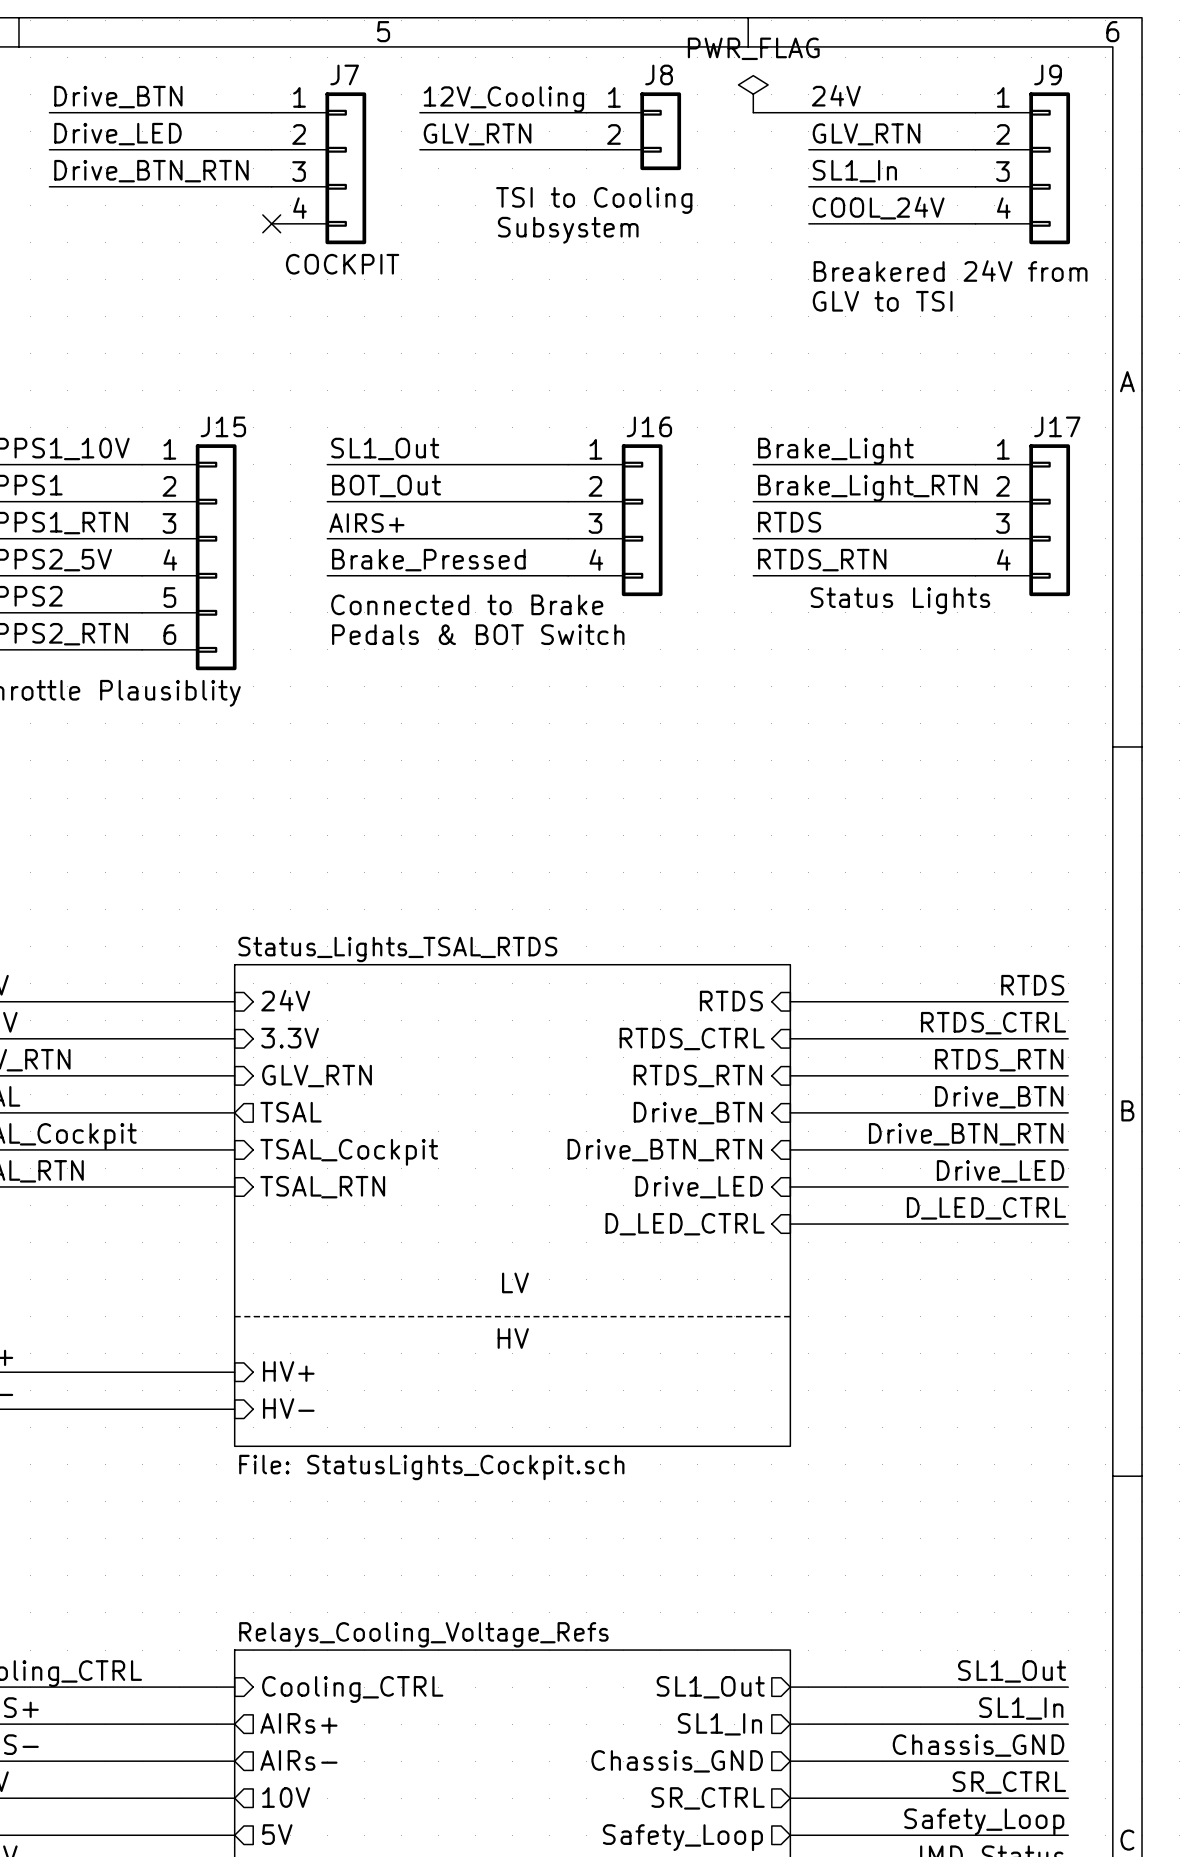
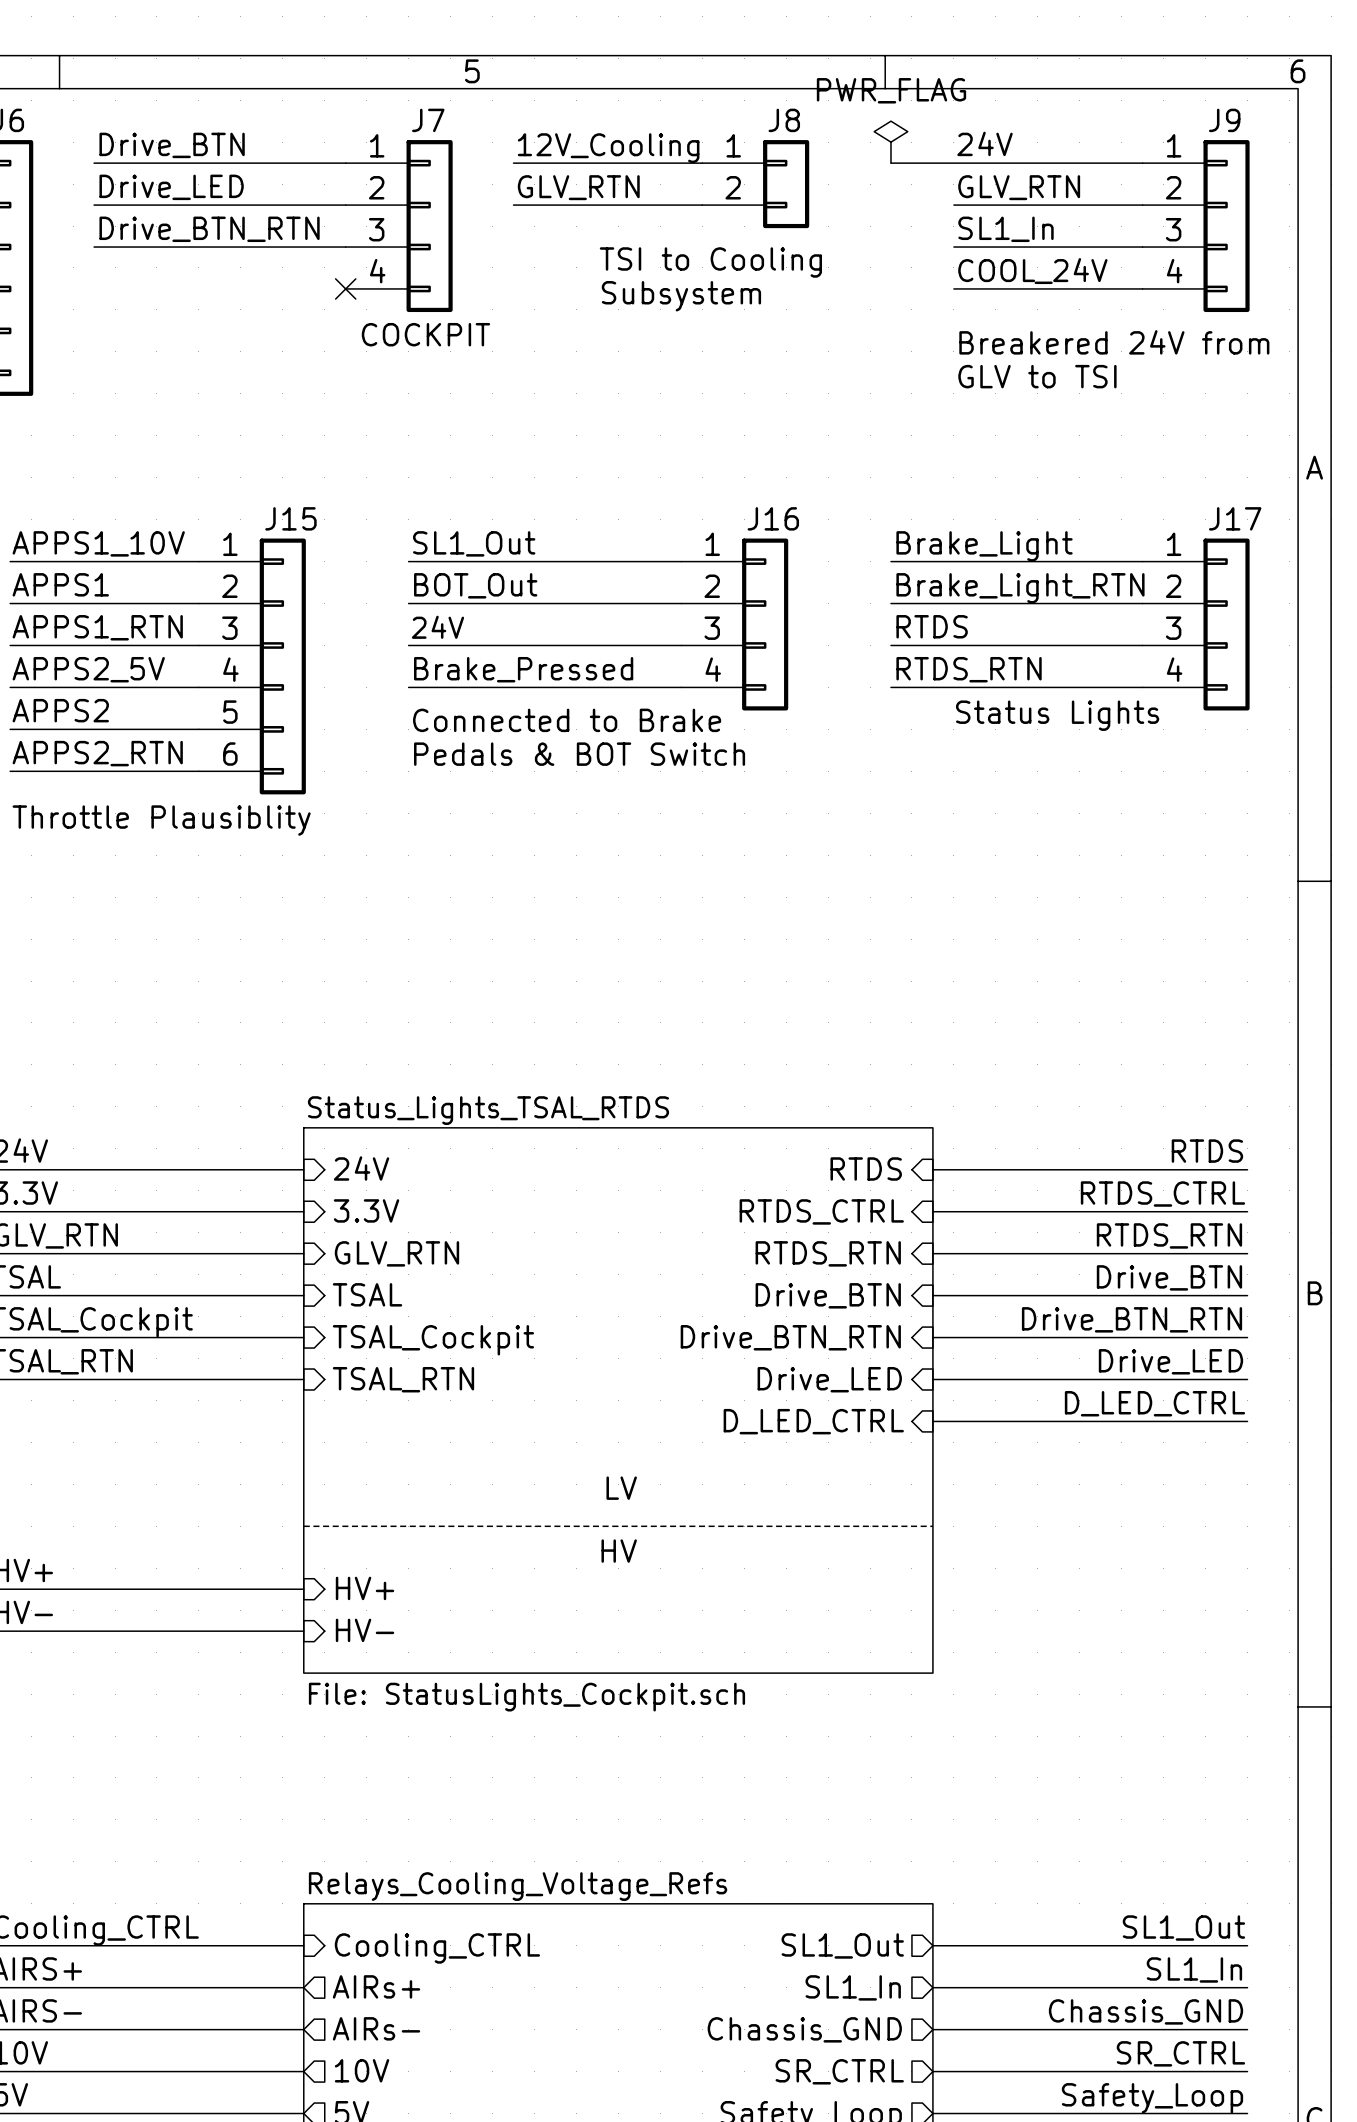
label: AIRS+ (366, 523) -> 24V (437, 627)
sheet pin shape: output (290, 1112) -> input (367, 1294)

